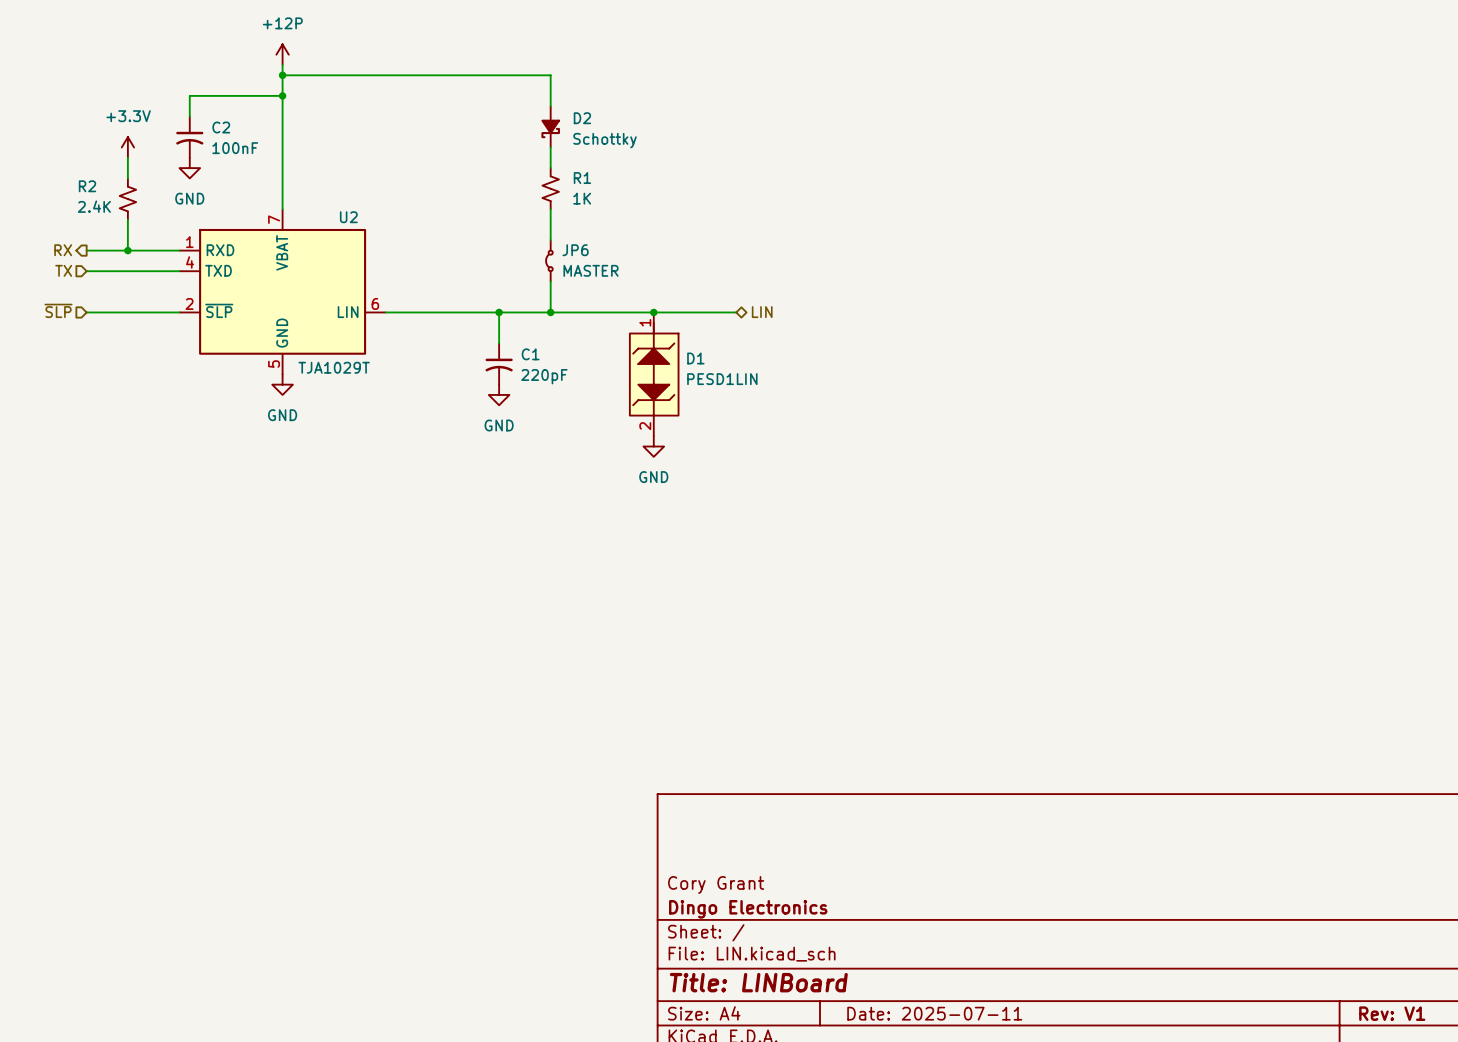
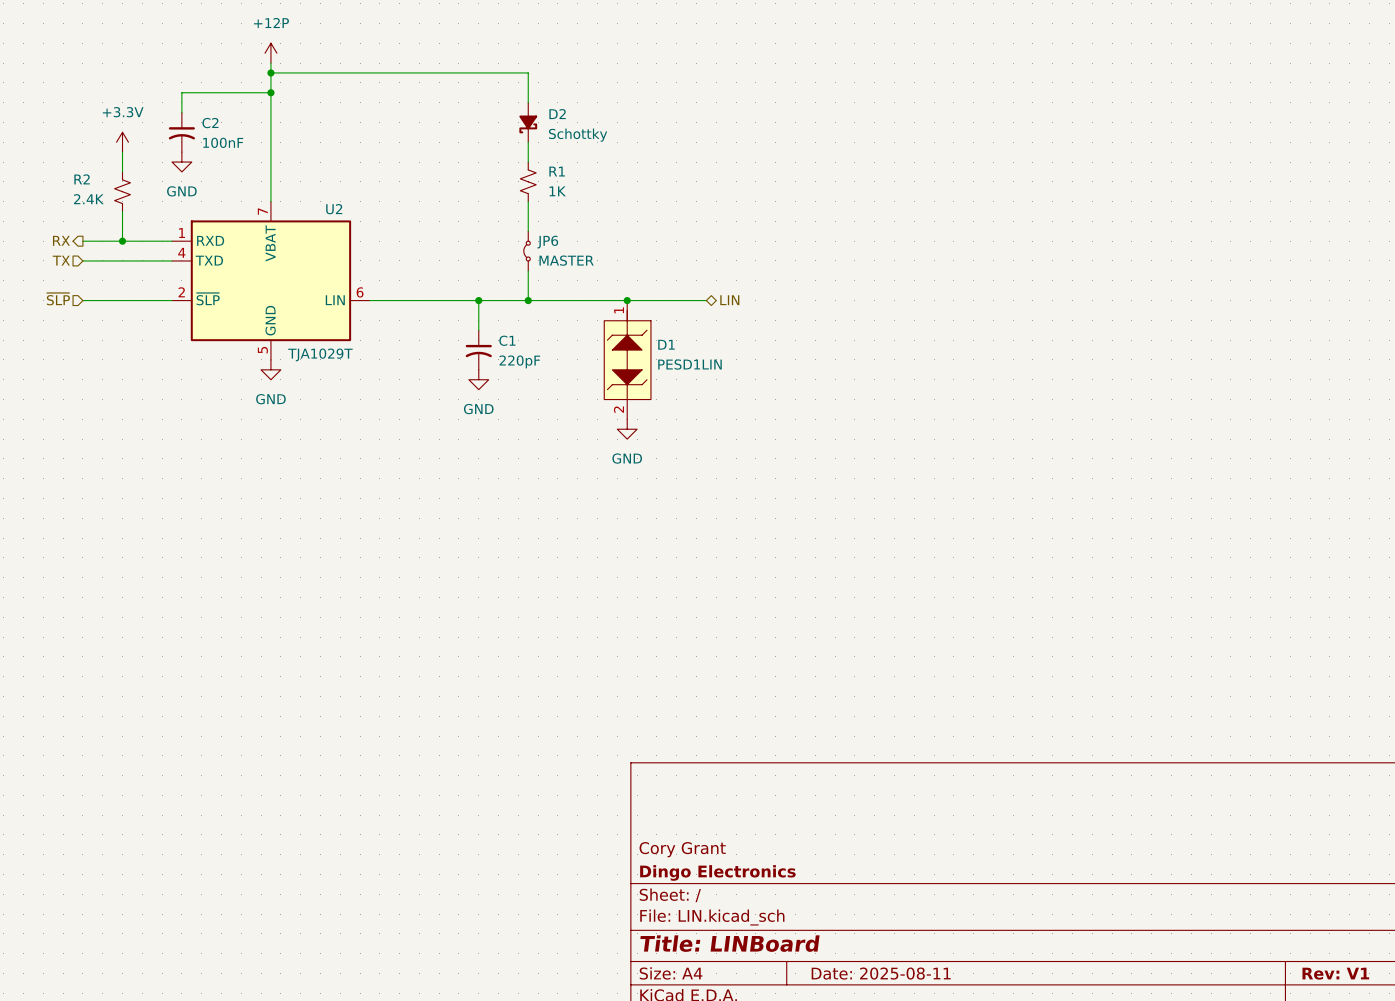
title block: Date: 2025-07-11 (934, 1013) -> Date: 2025-08-11 (881, 973)

